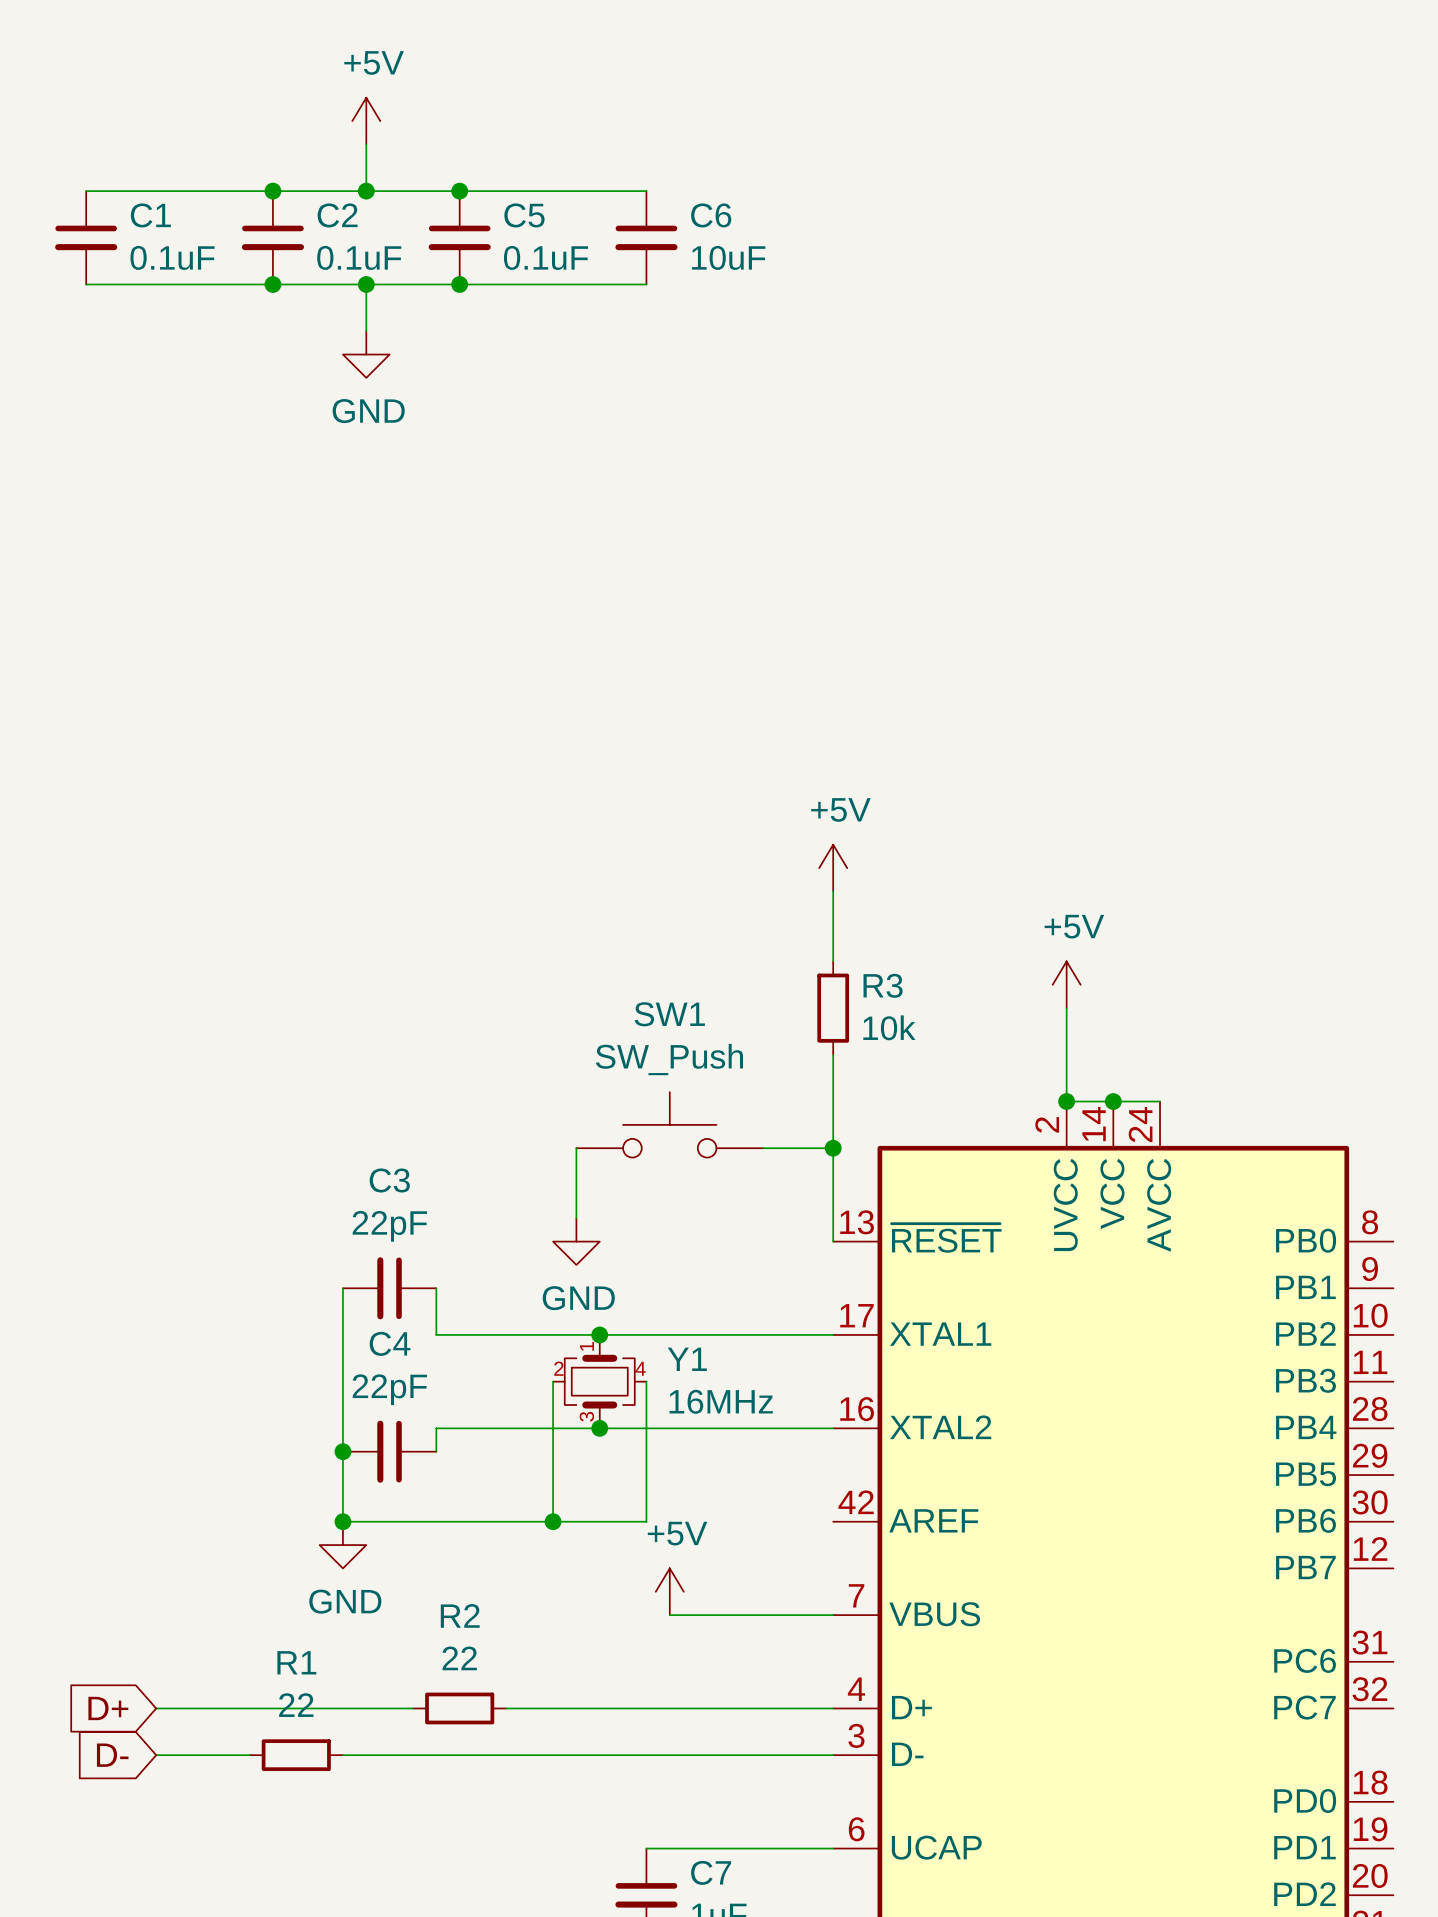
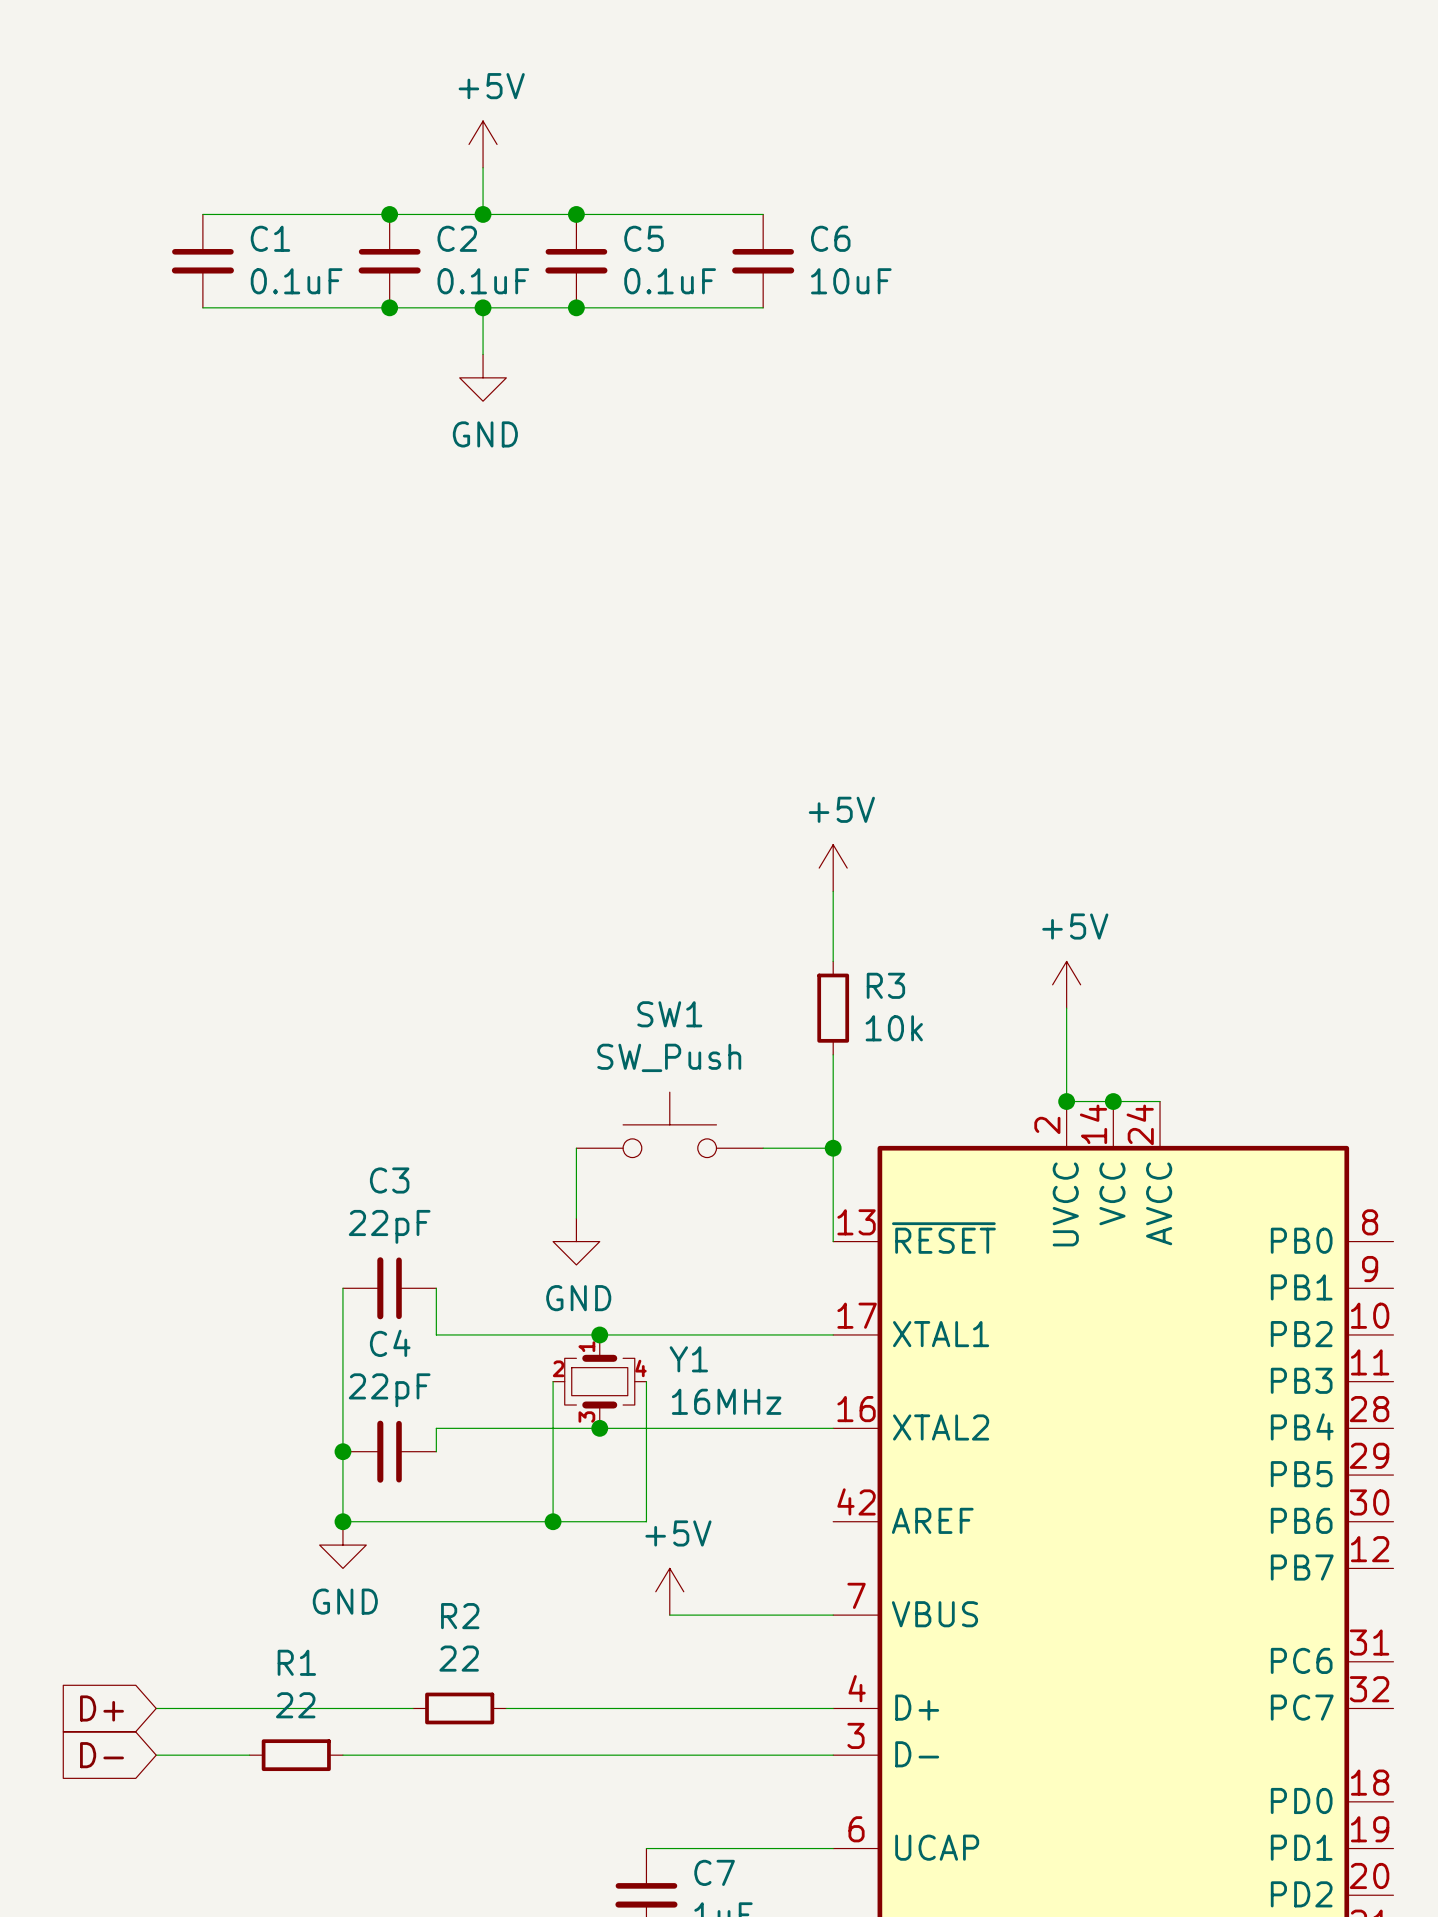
power symbol position: +5V (366, 121) -> +5V (483, 144)
wire: (366, 144) (366, 191) -> (483, 167) (483, 214)
wire: (86, 191) (646, 191) -> (202, 214) (763, 214)
junction: (272, 191) -> none
junction position: (366, 191) -> (389, 214)
junction position: (459, 191) -> (483, 214)
junction: none -> (576, 214)
C1 position: (86, 237) -> (202, 261)
C2 position: (272, 237) -> (389, 261)
C5 position: (459, 237) -> (576, 261)
C6 position: (646, 237) -> (763, 261)
wire: (86, 284) (646, 284) -> (202, 307) (763, 307)
junction: (272, 284) -> none
wire: (366, 284) (366, 331) -> (483, 307) (483, 354)
junction position: (366, 284) -> (389, 307)
junction position: (459, 284) -> (483, 307)
junction: none -> (576, 307)
power symbol position: GND (366, 354) -> GND (483, 377)

